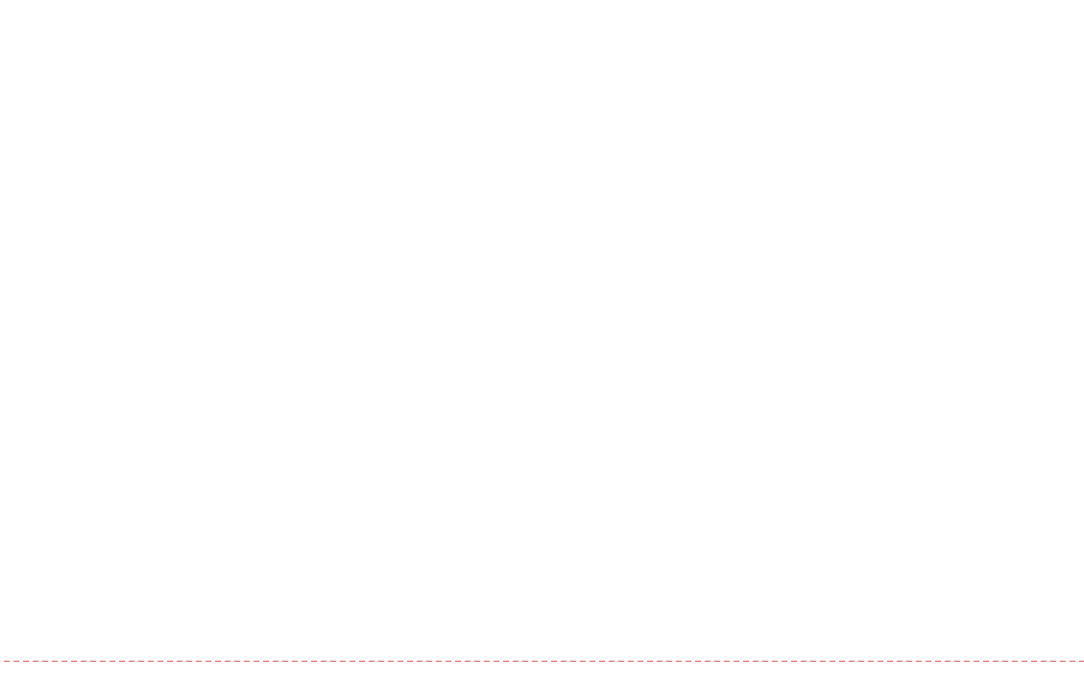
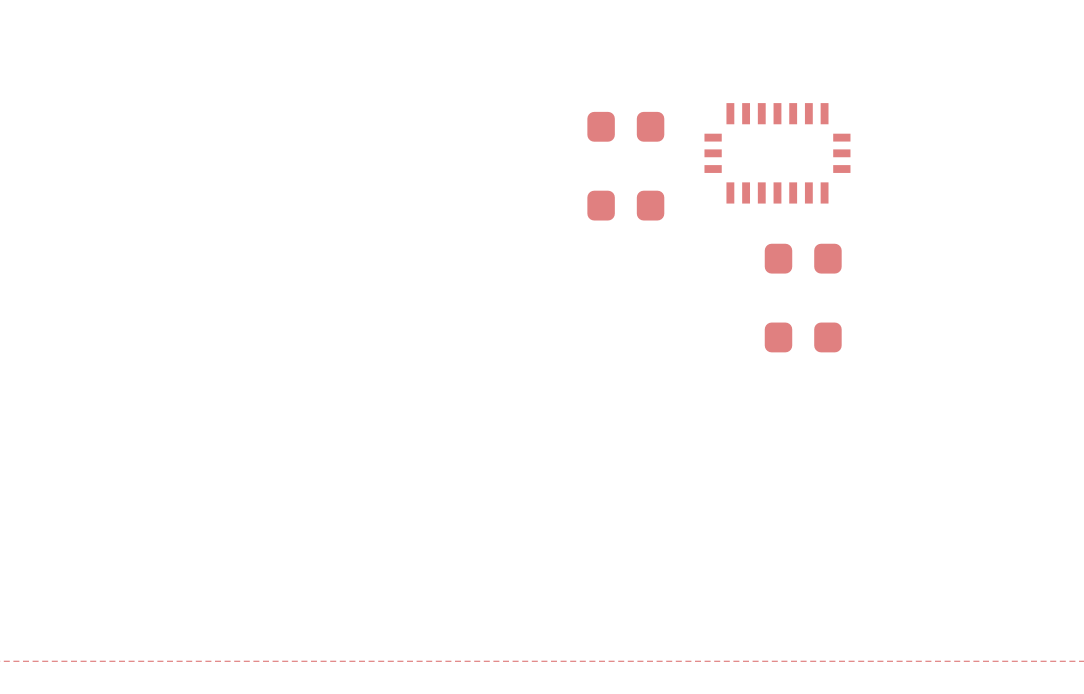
part: none -> (625, 126)
part: none -> (777, 153)
part: none -> (625, 205)
part: none -> (803, 258)
part: none -> (803, 337)

